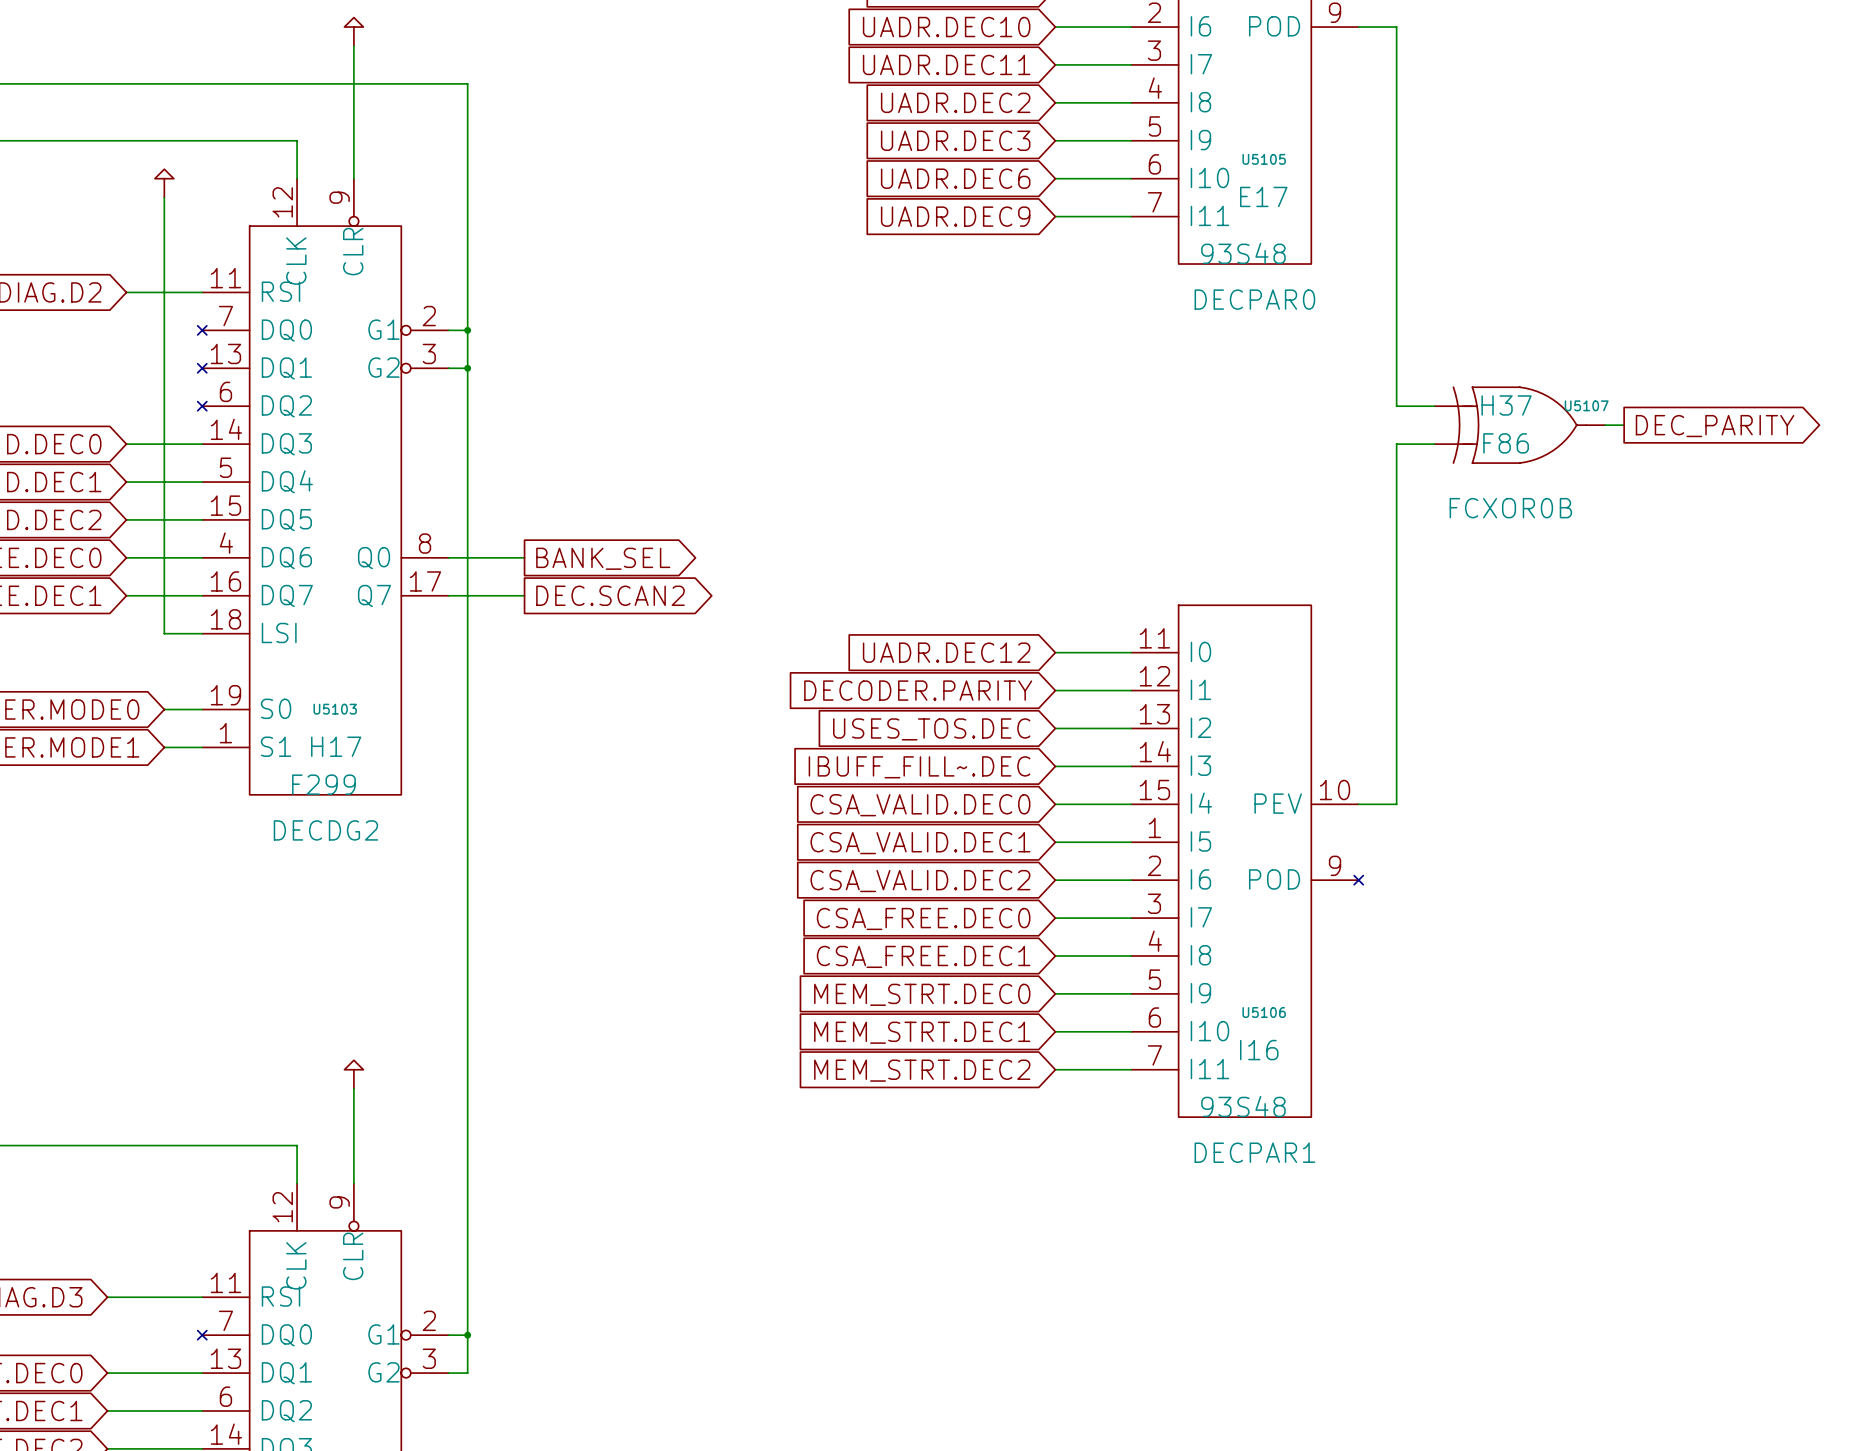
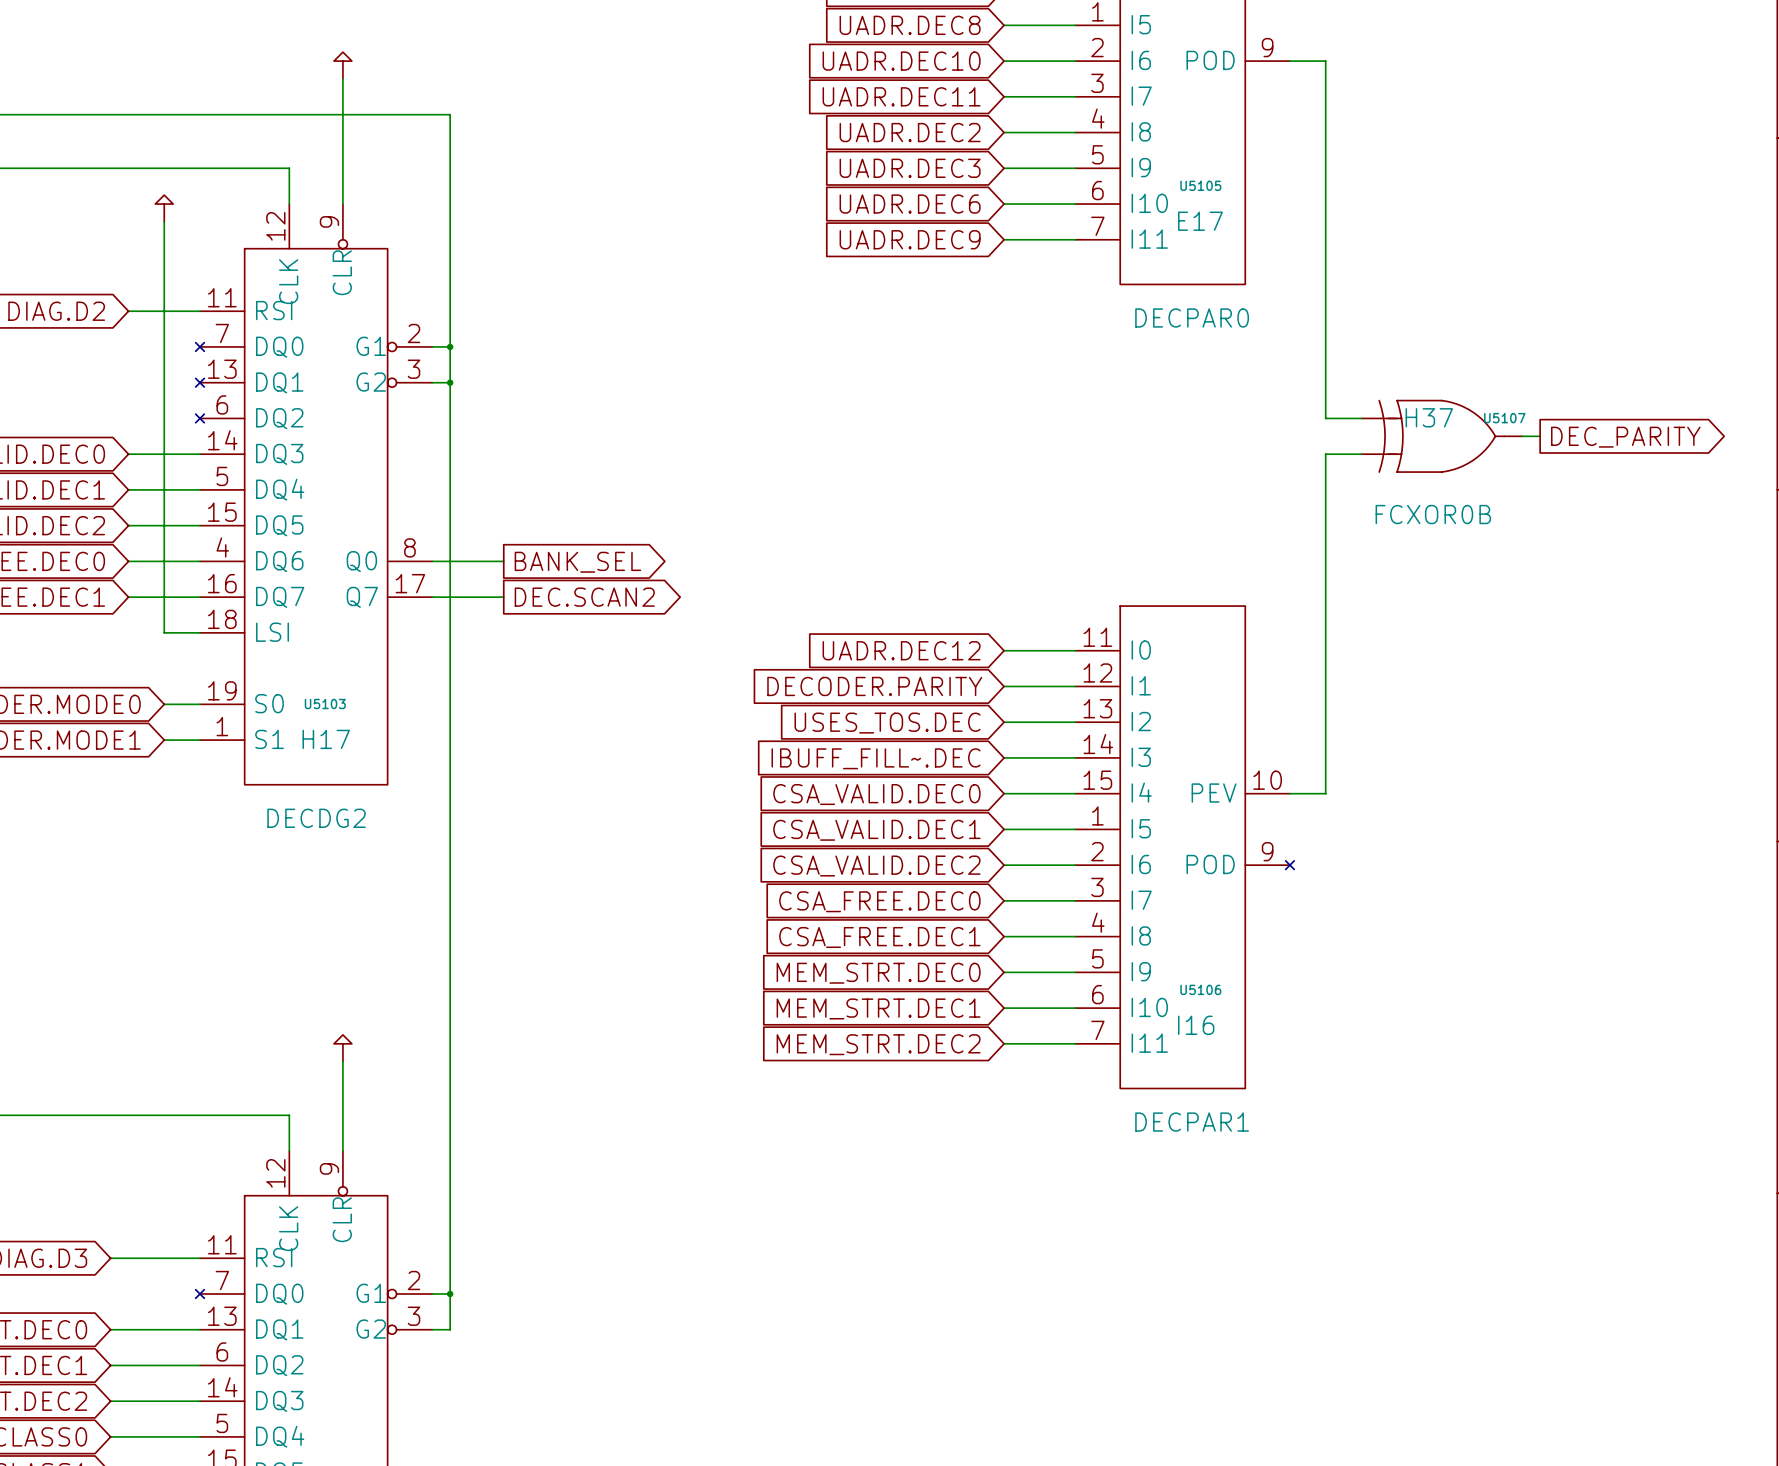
U5105 value: 93S48 (1243, 253) -> none
U5107 value: F86 (1506, 443) -> none
U5103 value: F299 (323, 784) -> none
U5106 value: 93S48 (1243, 1106) -> none

